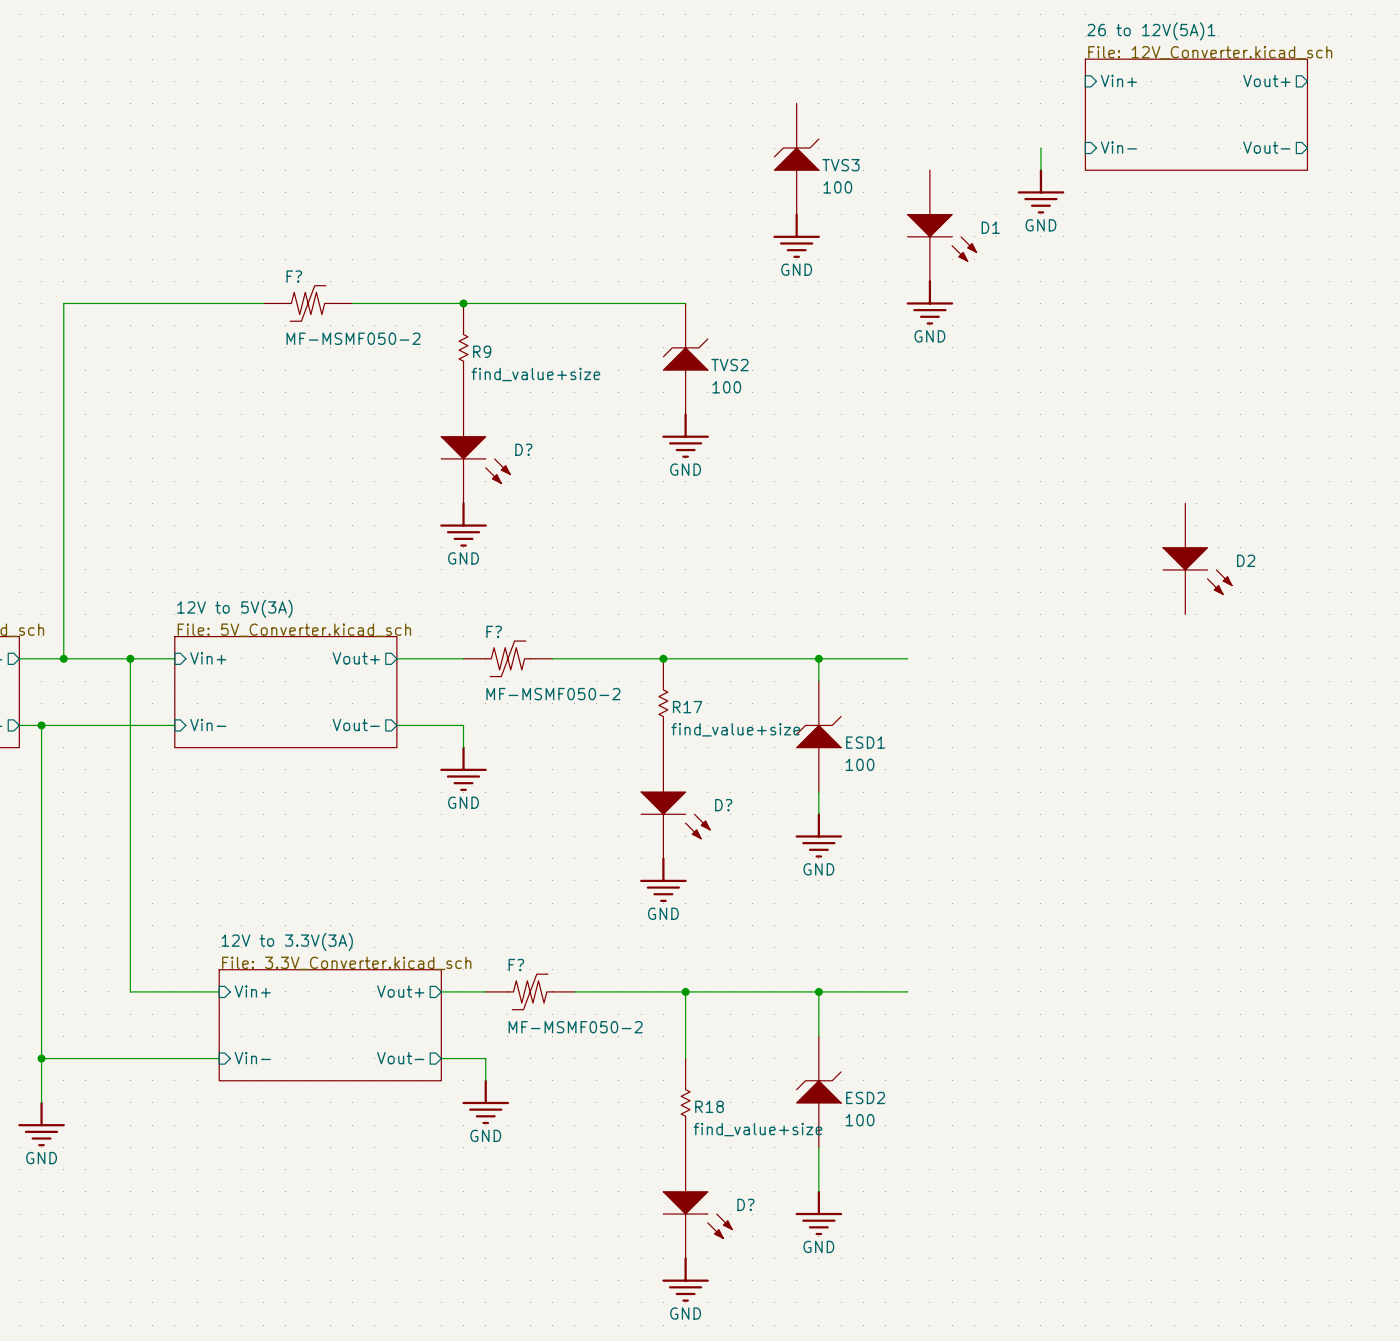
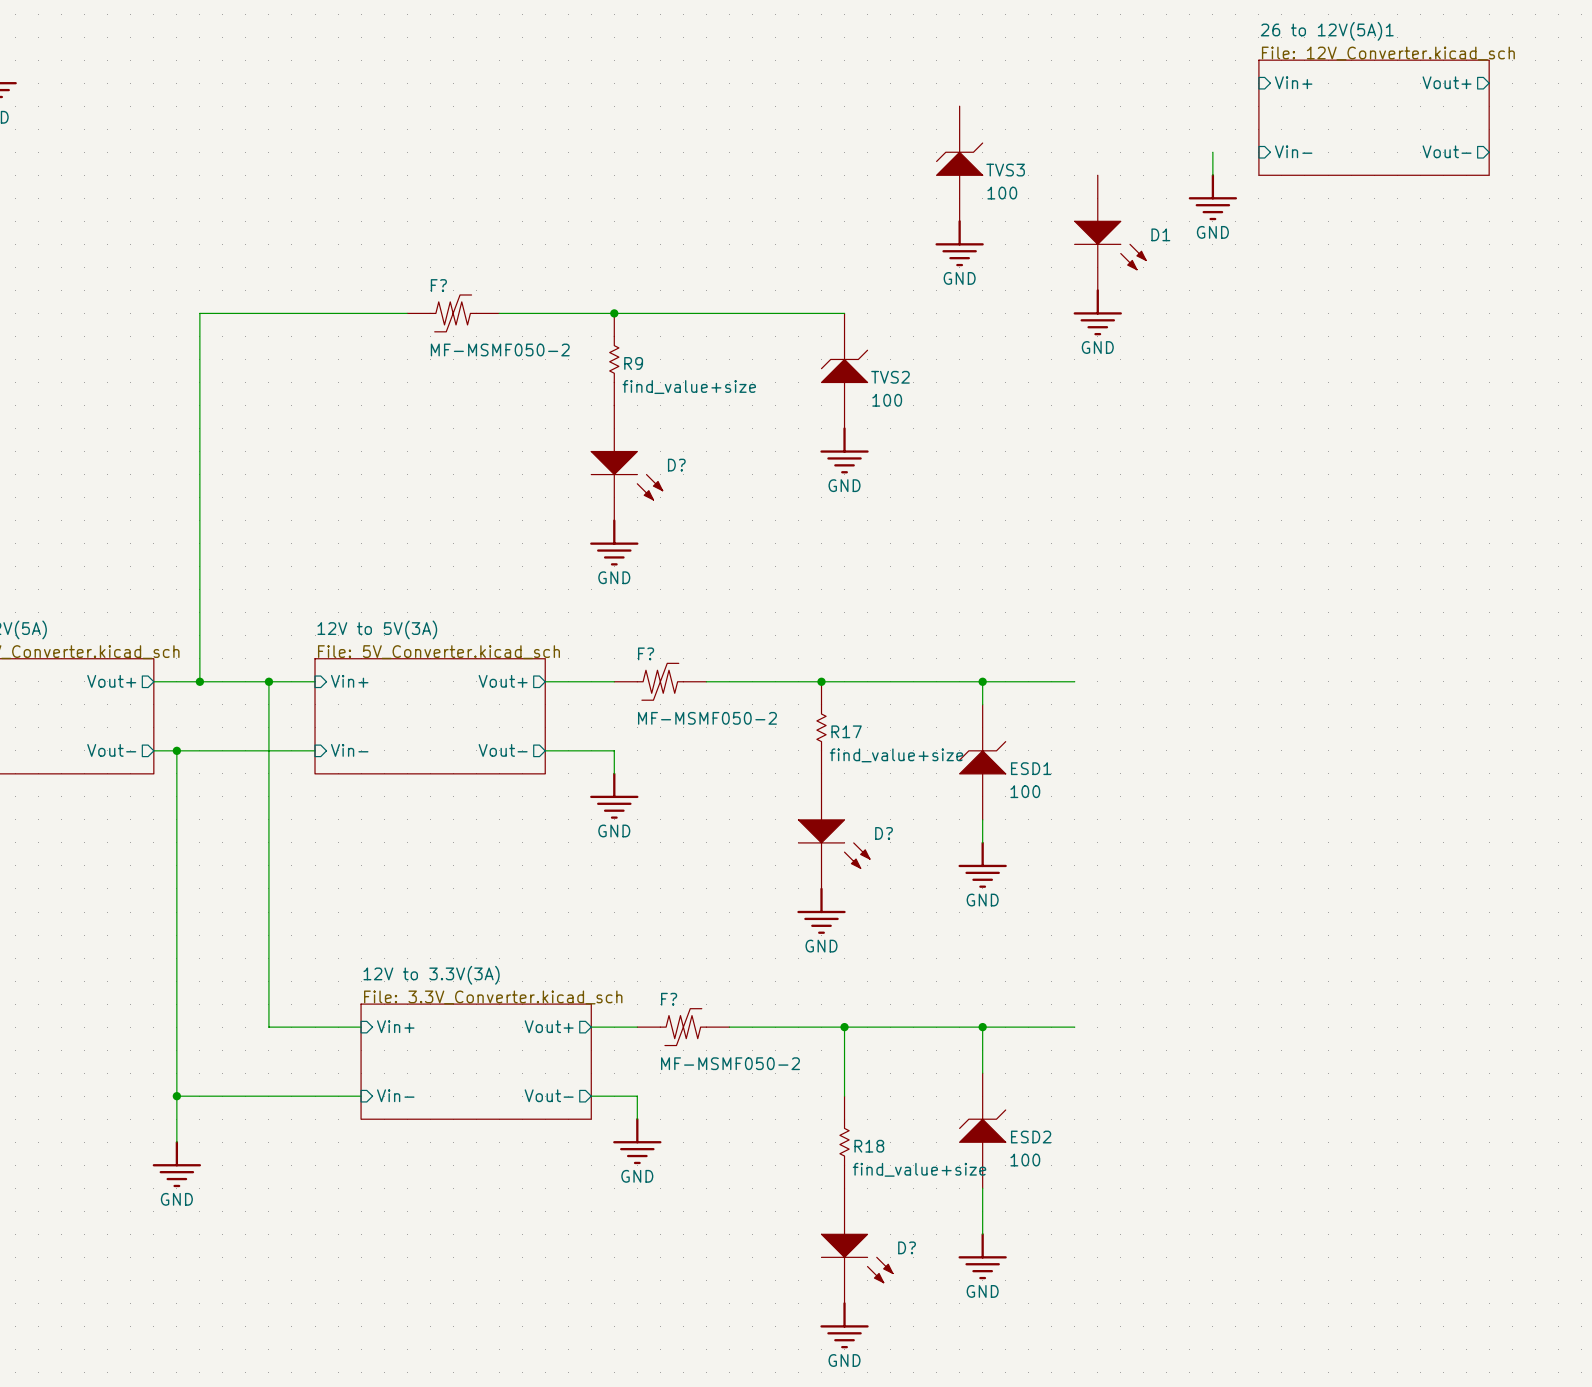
D2: (1197, 558) -> none

